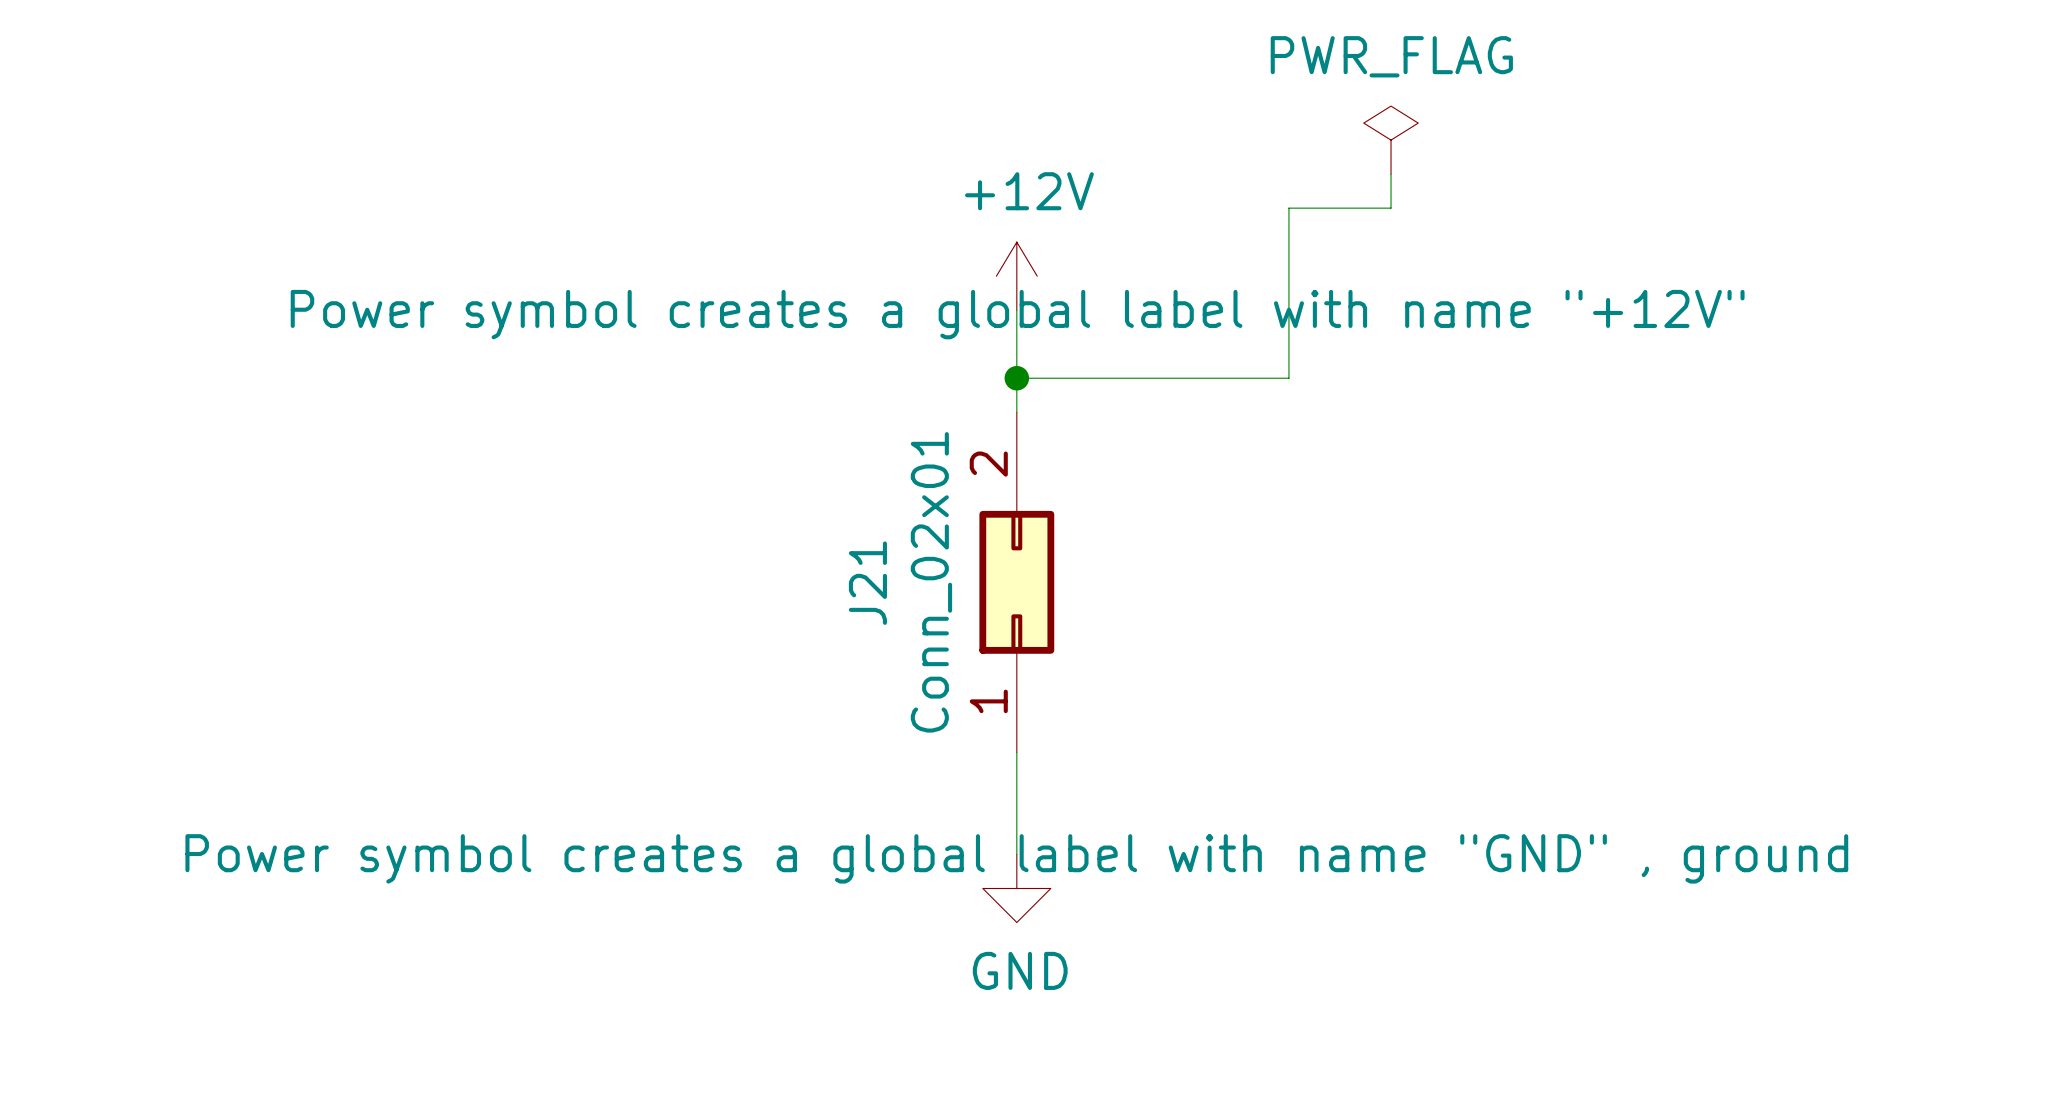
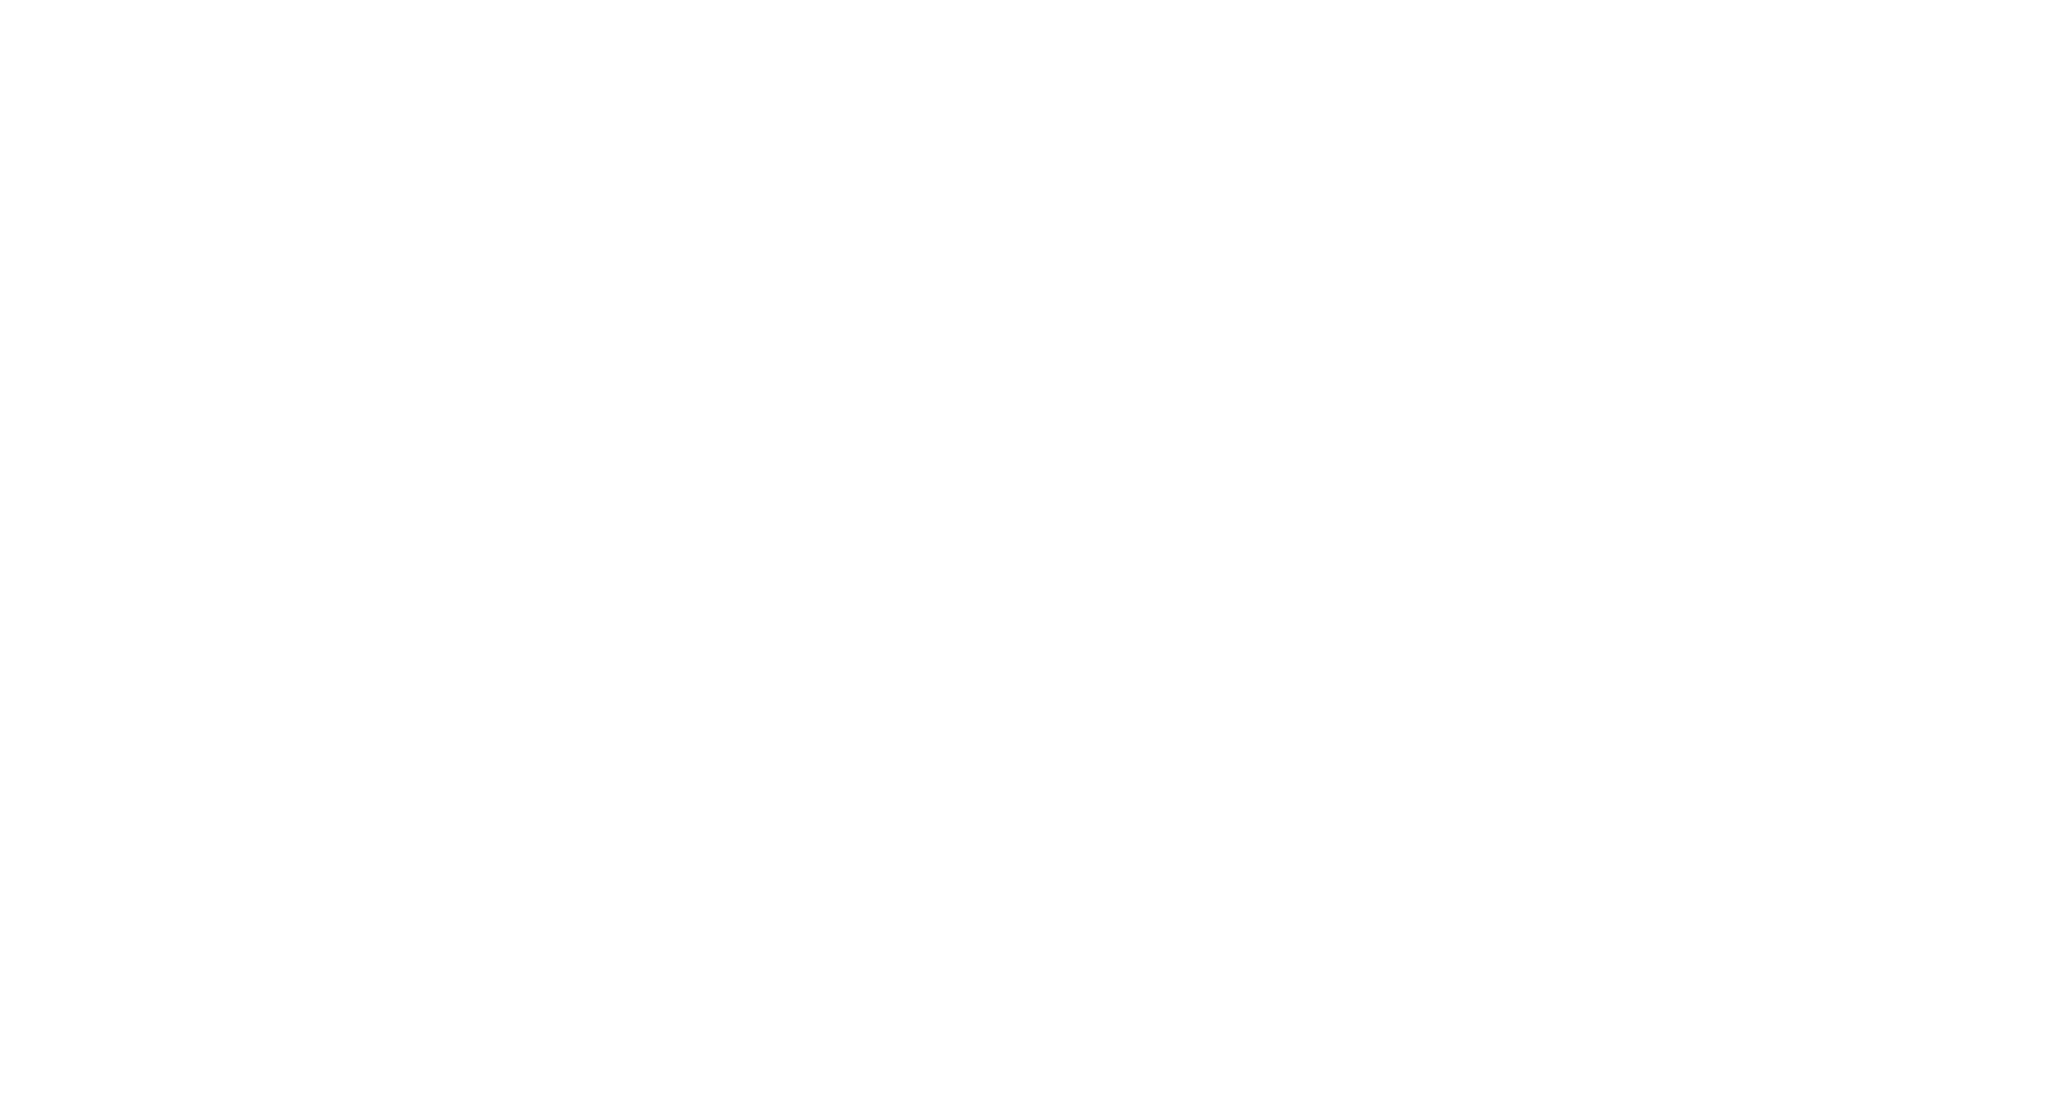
power symbol: PWR_FLAG (1391, 140) -> none
wire: (1391, 174) (1391, 208) (1288, 208) (1288, 378) (1016, 378) -> none
power symbol: +12V (1016, 276) -> none
wire: (1016, 310) (1016, 412) -> none
junction: (1016, 378) -> none
J21: Conn_02x01 (1016, 582) -> none
wire: (1016, 752) (1016, 854) -> none
power symbol: GND (1016, 888) -> none

